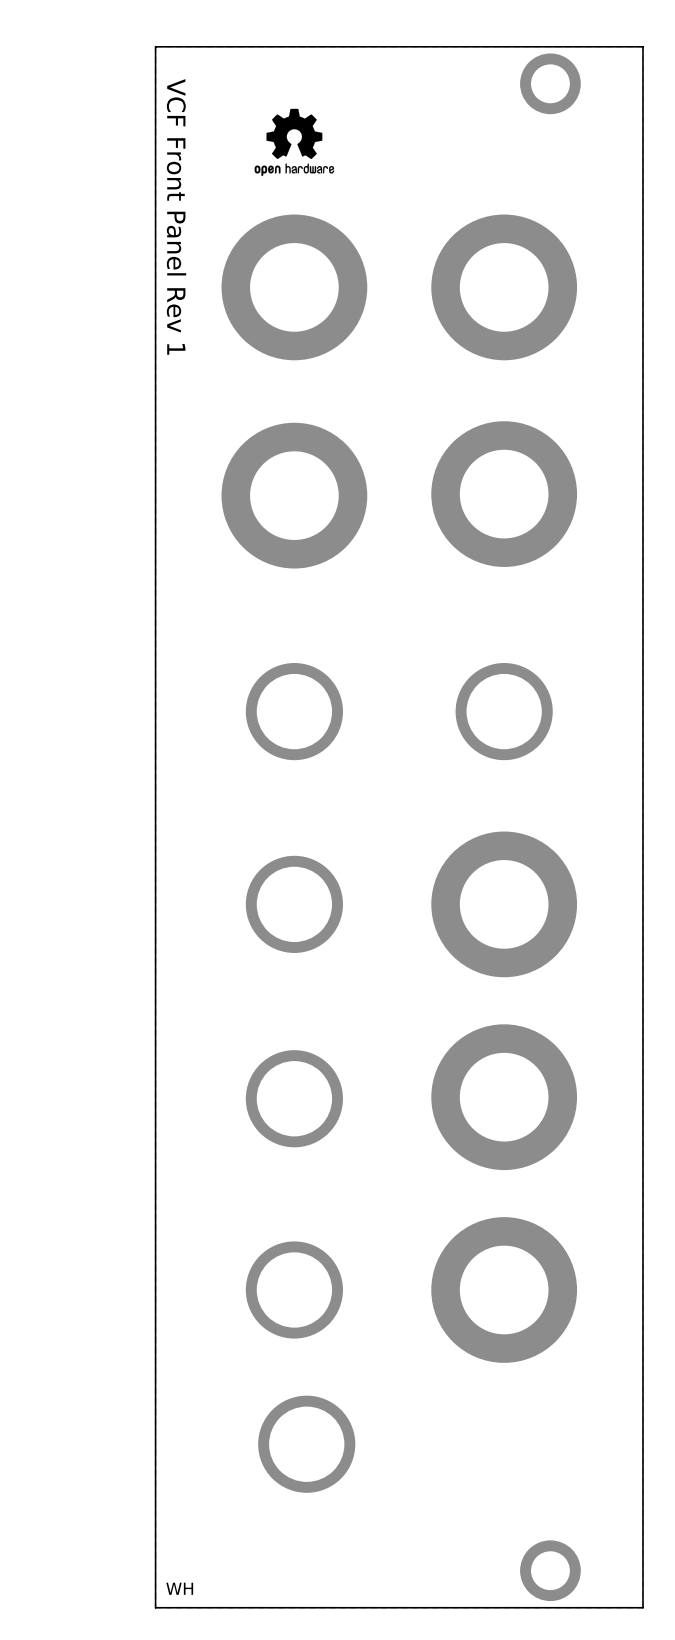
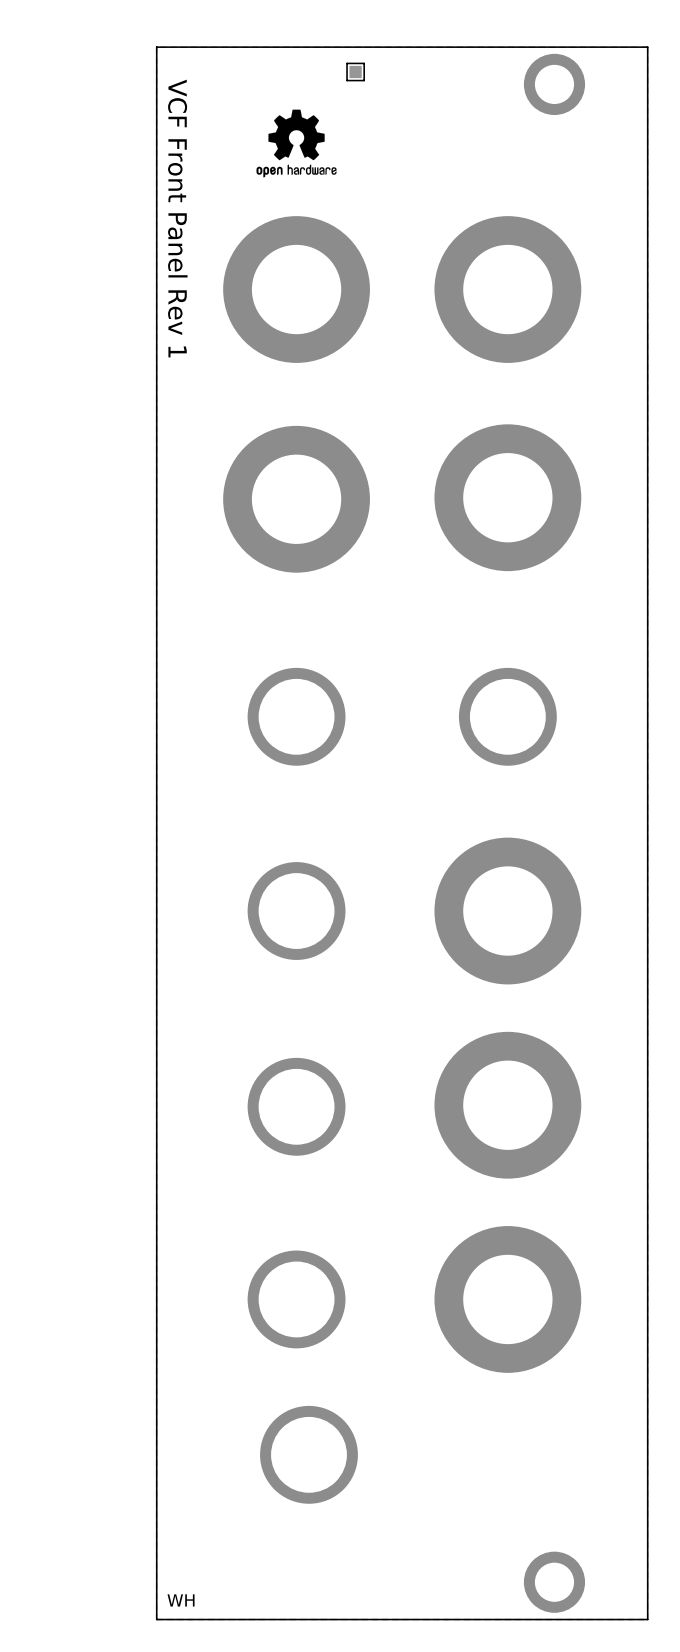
part: none -> (355, 72)

